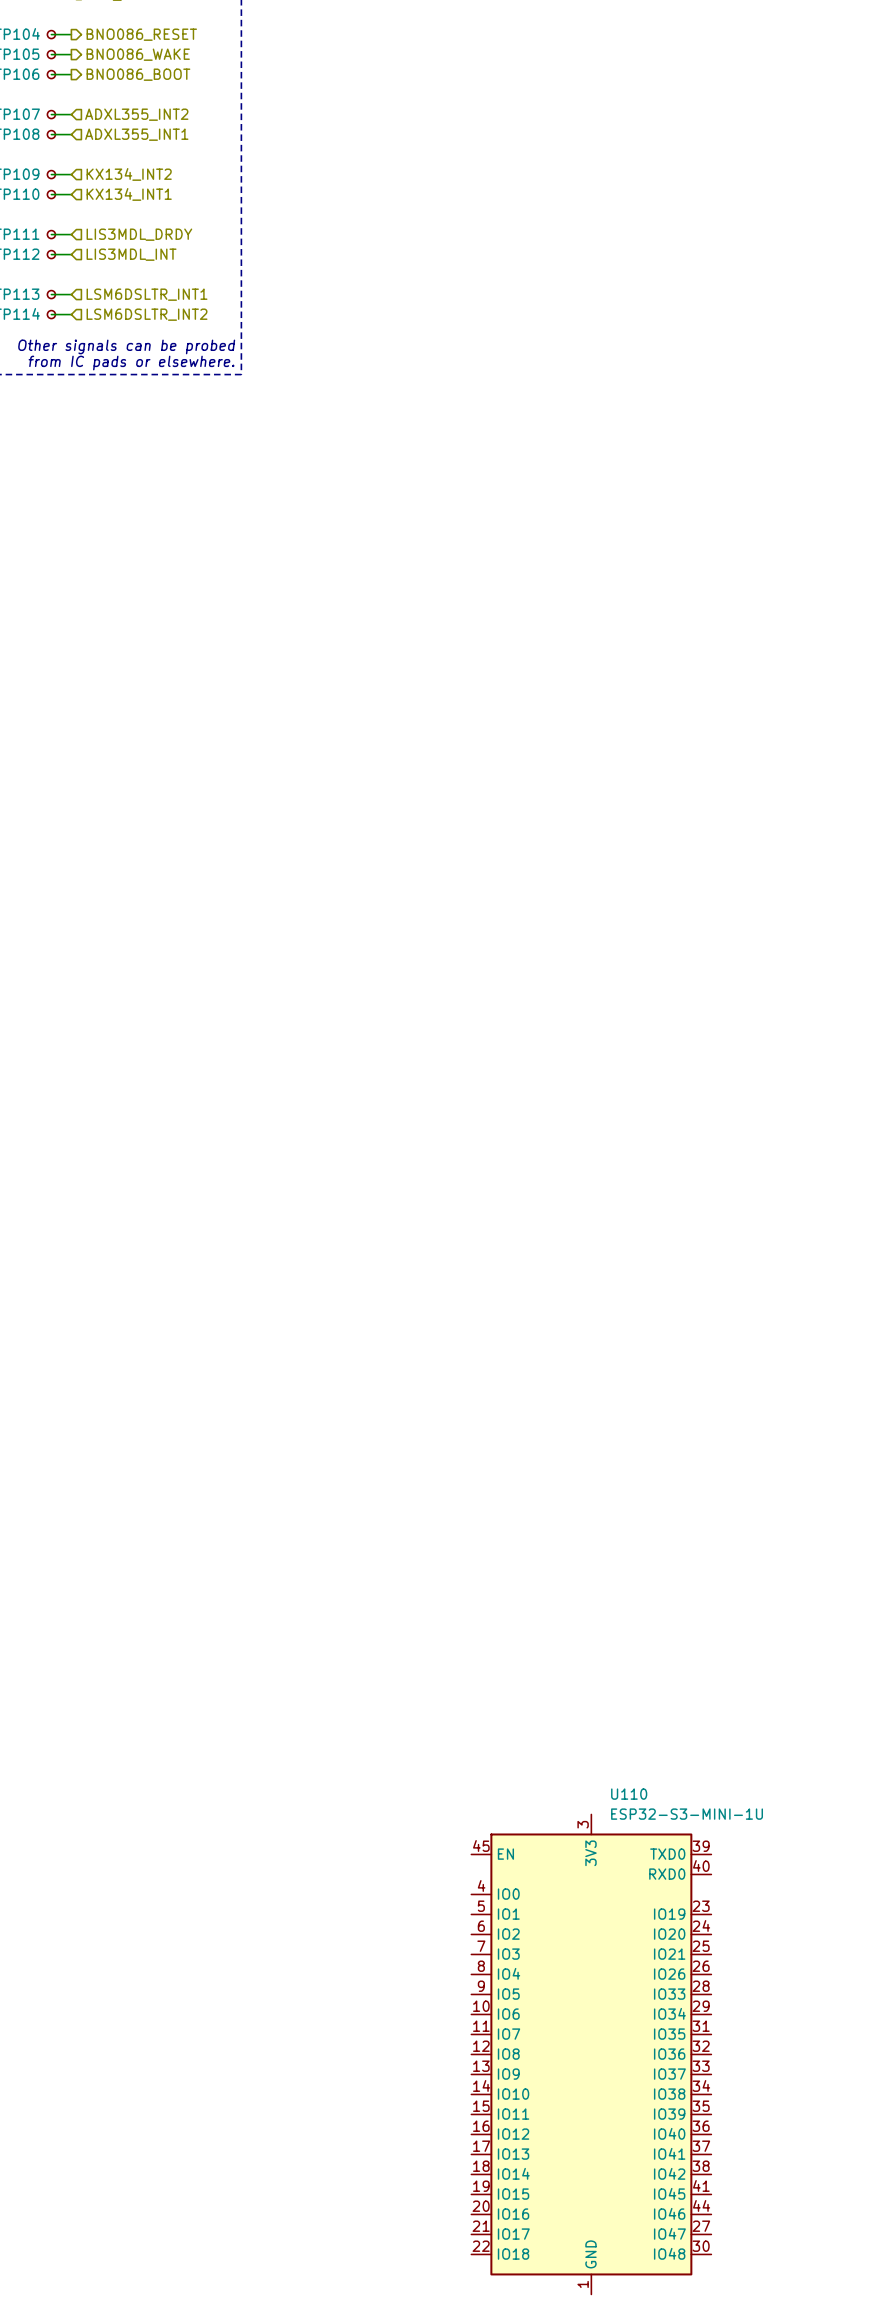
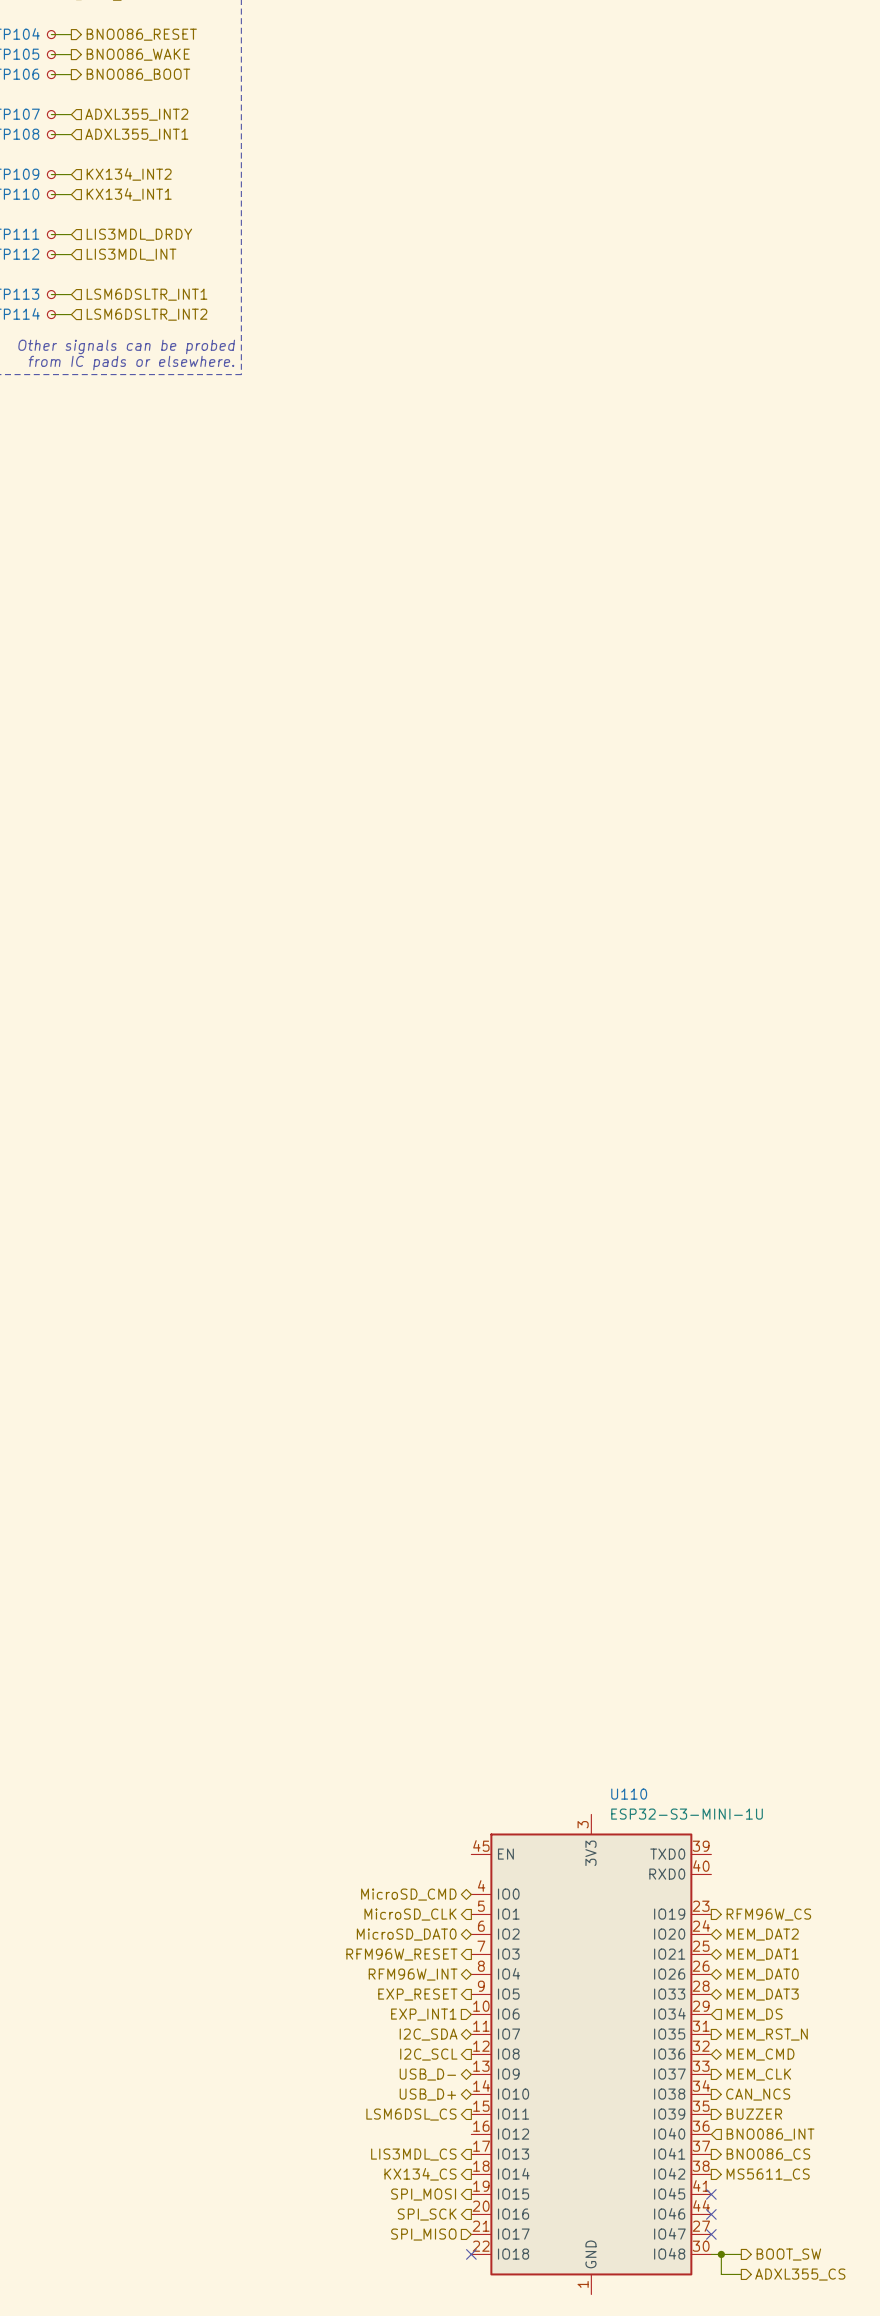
hierarchical label: none -> MicroSD_CMD (408, 1894)
hierarchical label: none -> MicroSD_CLK (410, 1914)
hierarchical label: none -> RFM96W_CS (768, 1914)
hierarchical label: none -> MicroSD_DAT0 (406, 1934)
hierarchical label: none -> MEM_DAT2 (762, 1934)
hierarchical label: none -> RFM96W_RESET (401, 1954)
hierarchical label: none -> MEM_DAT1 (762, 1954)
hierarchical label: none -> RFM96W_INT (413, 1974)
hierarchical label: none -> MEM_DAT0 (762, 1974)
hierarchical label: none -> EXP_RESET (417, 1994)
hierarchical label: none -> MEM_DAT3 (762, 1994)
hierarchical label: none -> EXP_INT1 (423, 2014)
hierarchical label: none -> MEM_DS (754, 2014)
hierarchical label: none -> I2C_SDA (428, 2034)
hierarchical label: none -> MEM_RST_N (767, 2034)
hierarchical label: none -> I2C_SCL (428, 2054)
hierarchical label: none -> MEM_CMD (760, 2054)
hierarchical label: none -> USB_D- (427, 2074)
hierarchical label: none -> MEM_CLK (758, 2074)
hierarchical label: none -> USB_D+ (427, 2094)
hierarchical label: none -> CAN_NCS (758, 2094)
hierarchical label: none -> LSM6DSL_CS (411, 2114)
hierarchical label: none -> BUZZER (754, 2114)
hierarchical label: none -> BNO086_INT (770, 2134)
hierarchical label: none -> LIS3MDL_CS (413, 2154)
hierarchical label: none -> BNO086_CS (768, 2154)
hierarchical label: none -> KX134_CS (420, 2174)
hierarchical label: none -> MS5611_CS (768, 2174)
hierarchical label: none -> SPI_MOSI (423, 2194)
no-connect mark: none -> (711, 2194)
hierarchical label: none -> SPI_SCK (427, 2214)
no-connect mark: none -> (711, 2214)
hierarchical label: none -> SPI_MISO (423, 2234)
no-connect mark: none -> (711, 2234)
no-connect mark: none -> (471, 2254)
wire: none -> (711, 2254) (741, 2254)
wire: none -> (721, 2254) (721, 2274) (741, 2274)
junction: none -> (721, 2254)
hierarchical label: none -> BOOT_SW (788, 2254)
hierarchical label: none -> ADXL355_CS (800, 2274)

